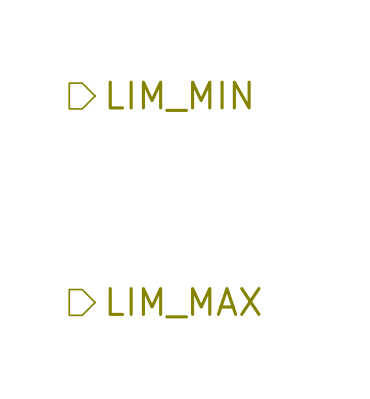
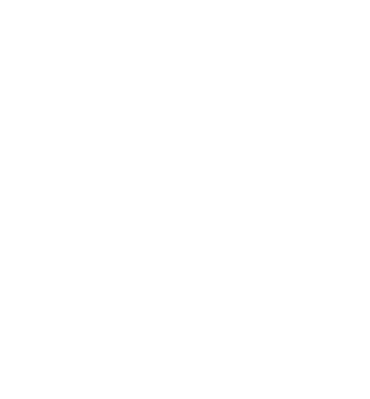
hierarchical label: LIM_MIN (179, 96) -> none
hierarchical label: LIM_MAX (184, 302) -> none

